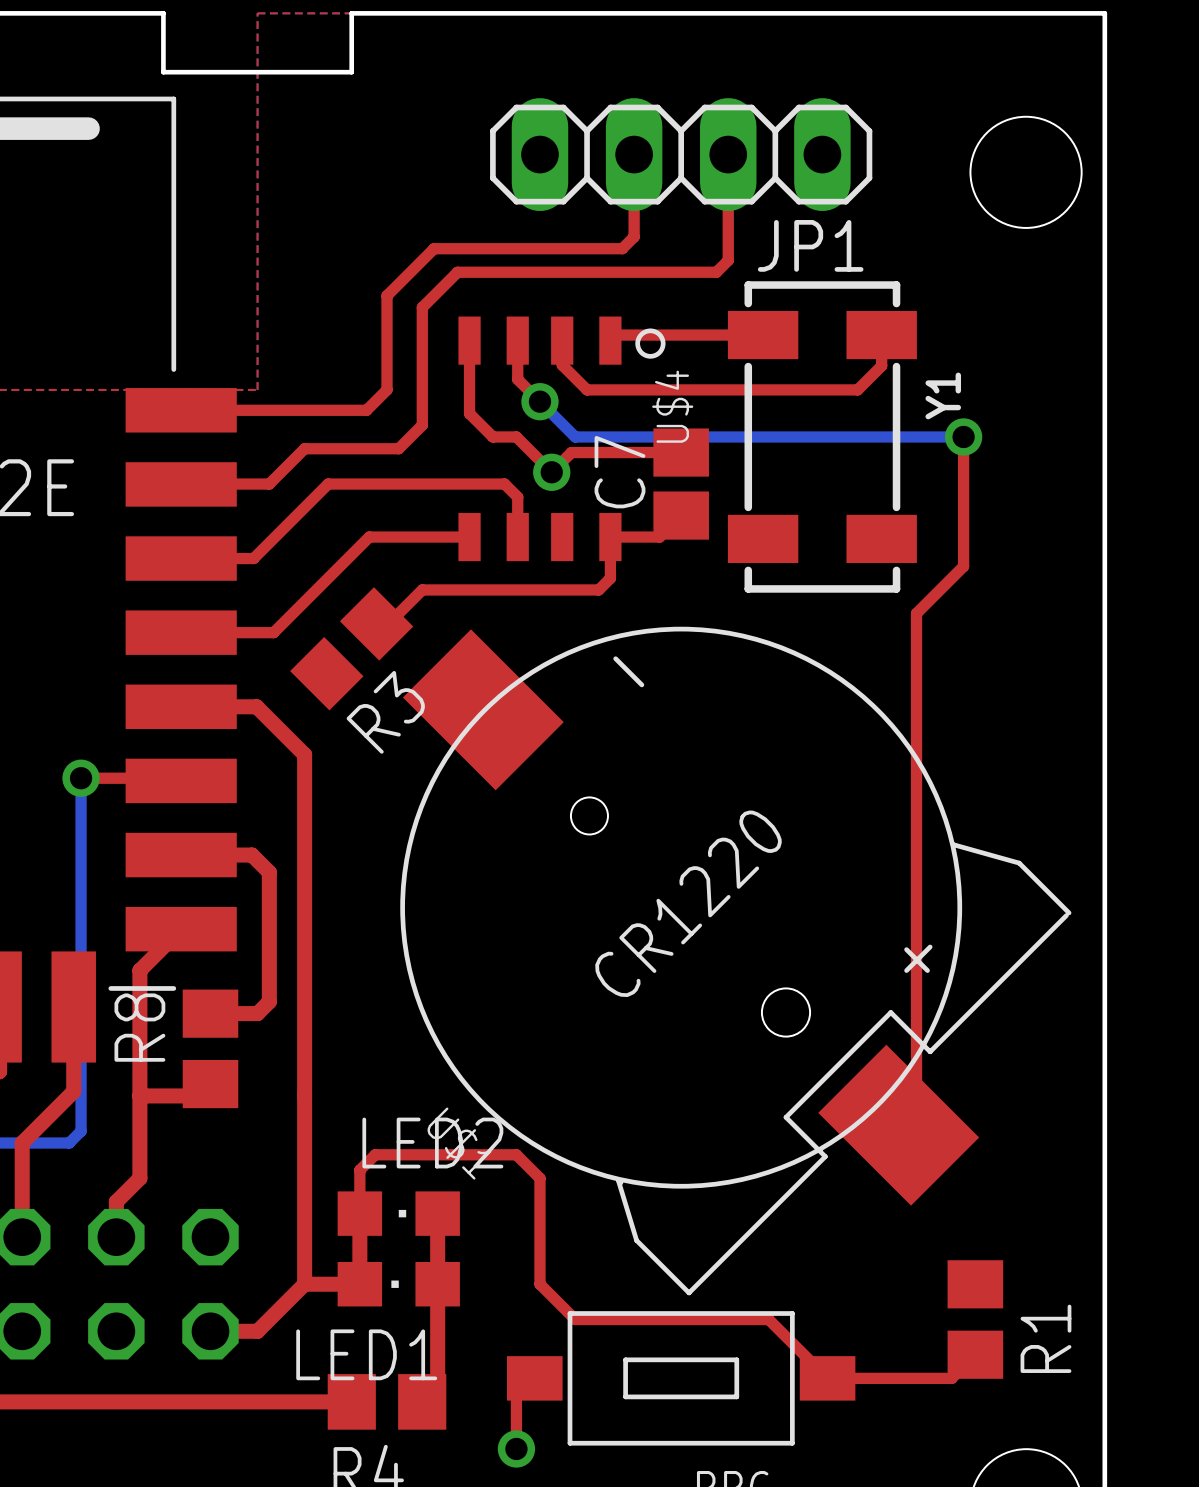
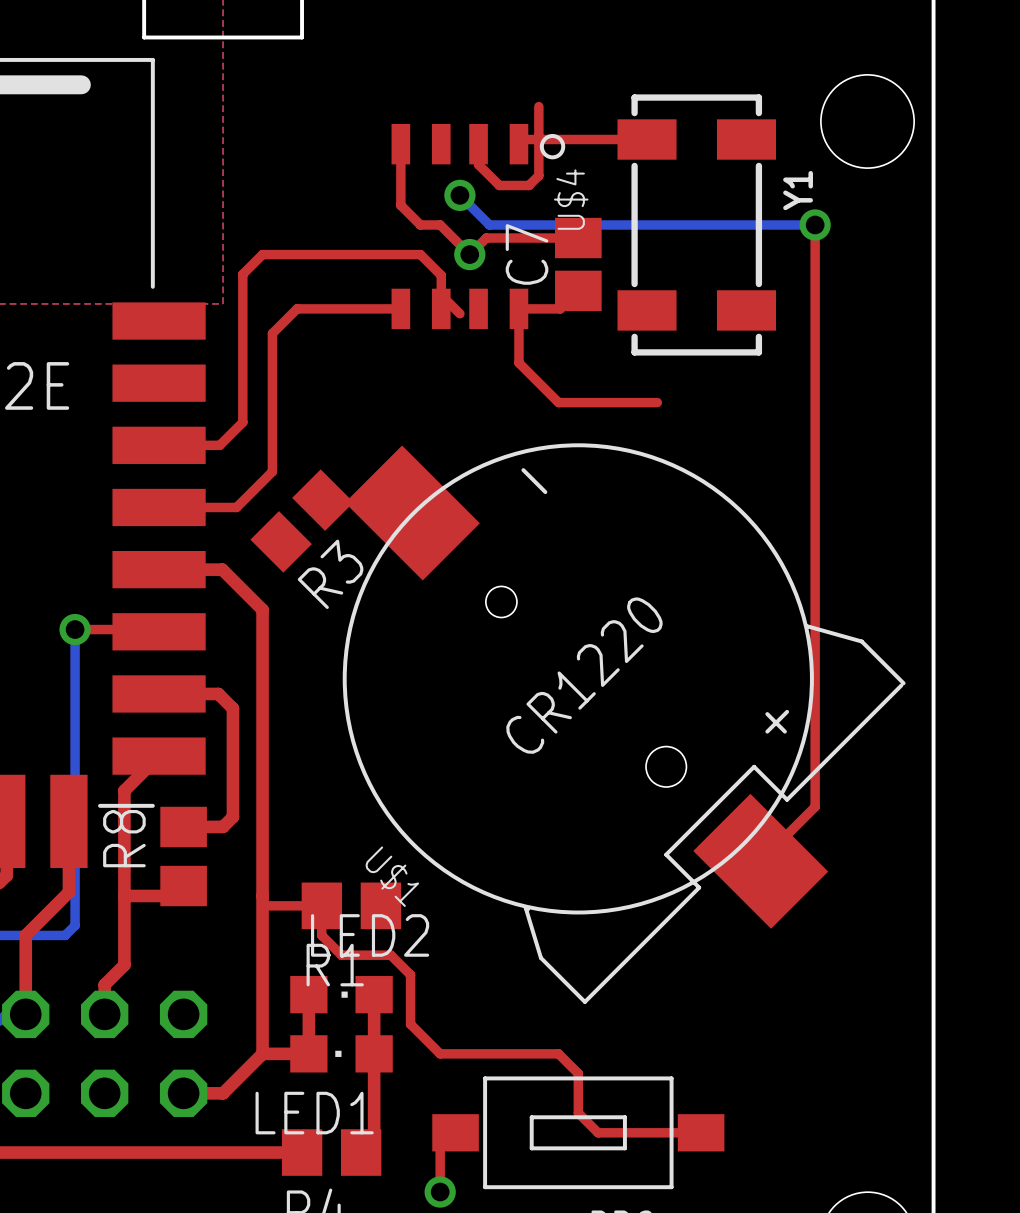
JP1: (681, 154) -> none
top track: (728, 154) (728, 260) (716, 272) (457, 272) (422, 307) (422, 425) (398, 448) (304, 448) (269, 484) (181, 484) -> none
top track: (587, 248) (434, 248) (387, 295) (387, 389) (366, 410) (181, 410) -> (499, 185) (478, 164) (478, 144)
via: none -> (459, 195)
top track: none -> (815, 224) (815, 343)
via: none -> (469, 254)
top track: (763, 335) (615, 335) (610, 340) -> (647, 139) (523, 139) (518, 144)
top track: (881, 335) (881, 365) (857, 389) (587, 389) (562, 365) (562, 340) -> none
top track: (469, 340) (469, 413) (492, 436) (516, 436) (551, 472) (571, 452) (681, 452) -> (400, 144) (400, 205) (420, 224) (440, 224) (469, 254) (486, 238) (578, 238)
top track: none -> (578, 290) (560, 308) (518, 308) (518, 362) (558, 402) (657, 402)
bottom track: (539, 401) (575, 436) (963, 436) -> (459, 195) (489, 224) (815, 224)
via: (539, 401) -> none
Y1 position: (822, 436) -> (696, 224)
via position: (963, 436) -> (815, 224)
U$4 position: (561, 438) -> (478, 226)
via: (551, 472) -> none
C7 position: (681, 484) -> (578, 264)
top track: (681, 515) (659, 537) (610, 537) (610, 578) (598, 589) (422, 589) (388, 623) (376, 623) -> none
top track: (281, 531) (328, 484) (504, 484) (517, 497) (517, 537) -> (242, 422) (242, 274) (262, 254) (420, 254) (441, 275)
top track: (469, 537) (369, 537) (316, 589) -> (400, 308) (297, 308) (272, 333) (272, 471)
top track: (963, 566) (916, 613) (916, 1083) (898, 1125) -> (815, 451) (815, 806) (760, 861)
U$1 position: (735, 961) -> (624, 723)
top track: none -> (262, 905) (321, 905)
top track: none -> (321, 905) (321, 935) (341, 955) (390, 955) (410, 974) (410, 1024) (440, 1053) (558, 1053) (578, 1073) (578, 1113) (598, 1132) (701, 1132)
top track: (359, 1213) (359, 1170) (375, 1154) (516, 1154) (539, 1178) (539, 1284) (575, 1319) (768, 1319) (827, 1378) (951, 1378) (975, 1354) -> none
R1 rotation: 0° (975, 1319) -> 90° clockwise (351, 905)
R1 position: (975, 1319) -> (351, 905)

